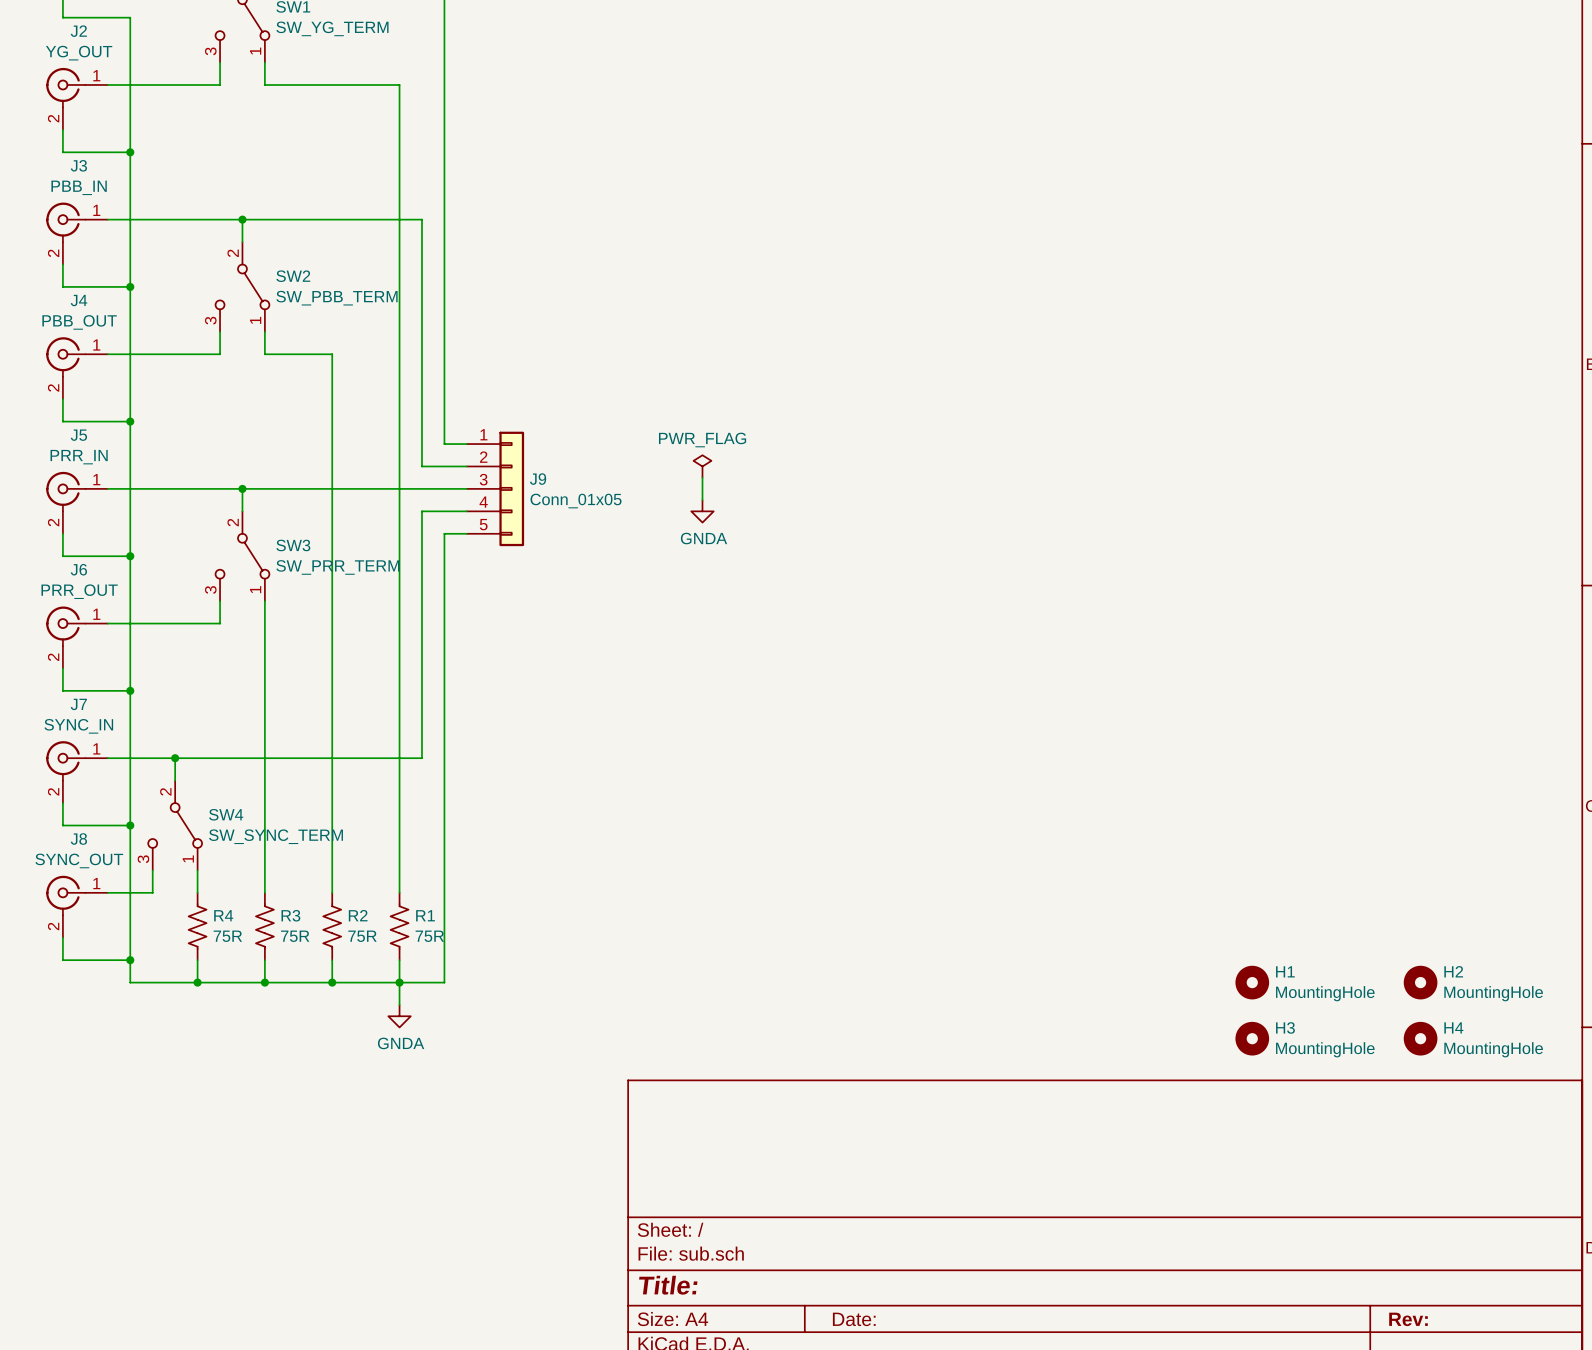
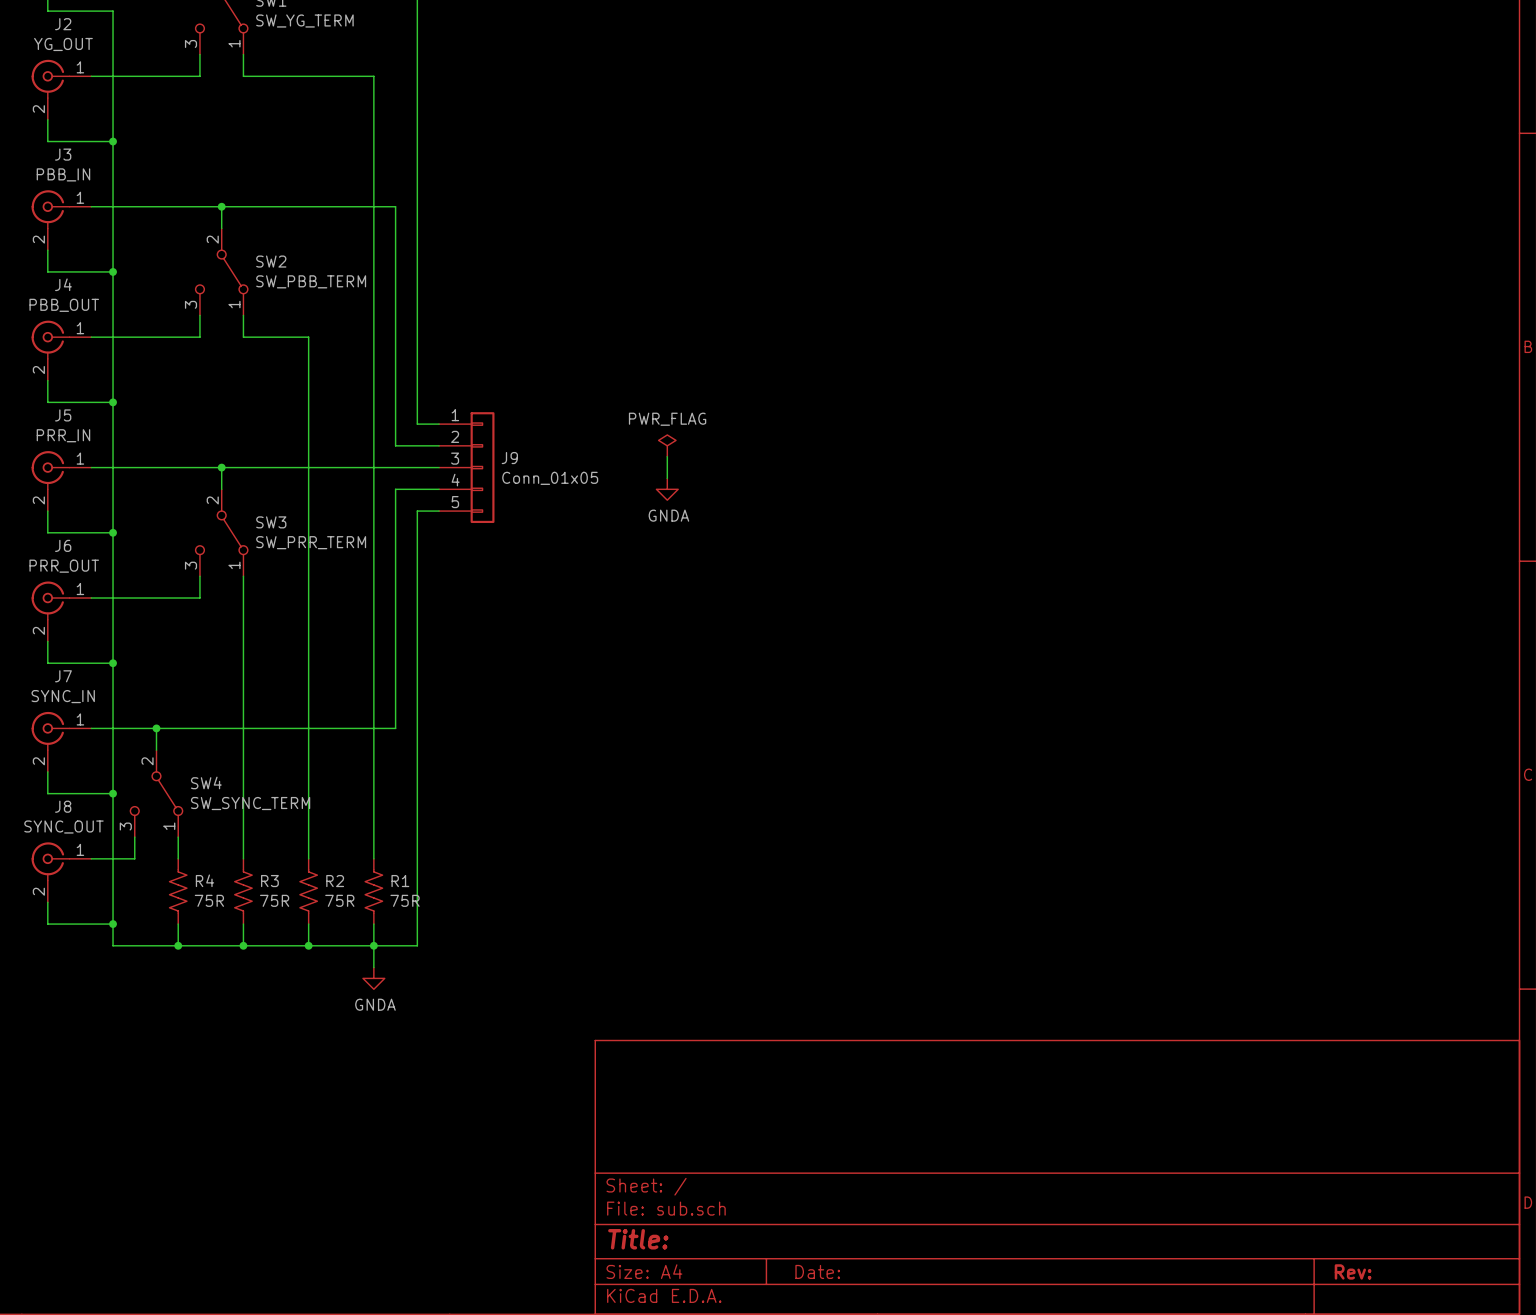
H1: MountingHole (1252, 982) -> none
H2: MountingHole (1420, 982) -> none
H3: MountingHole (1252, 1038) -> none
H4: MountingHole (1420, 1038) -> none

